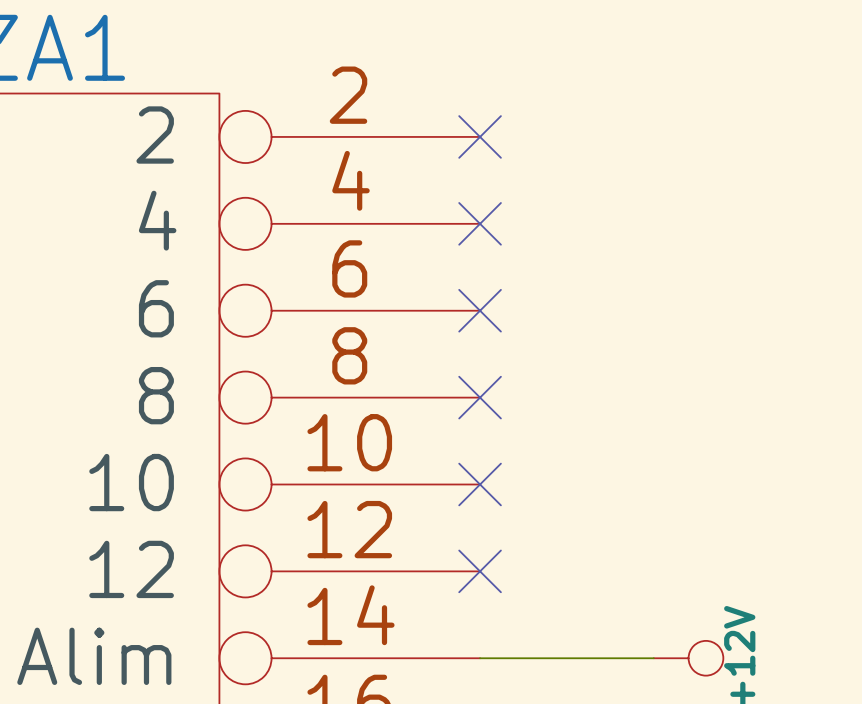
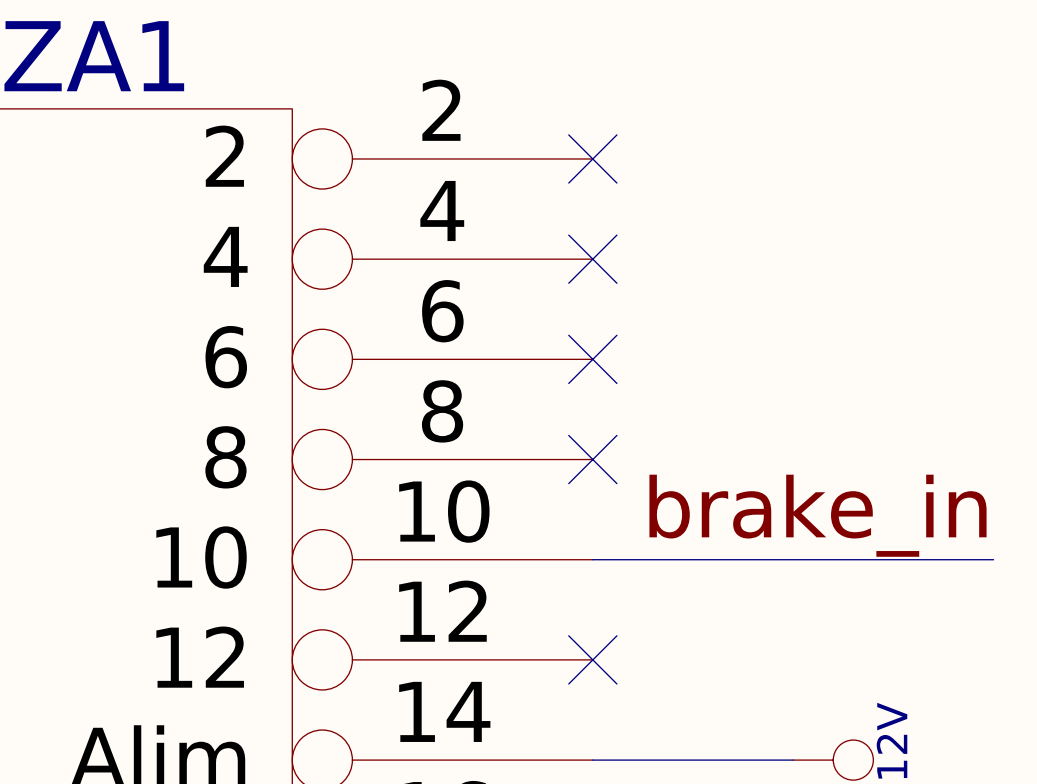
label: none -> brake_in (818, 515)
wire: none -> (592, 559) (993, 559)
no-connect mark: (480, 484) -> none

